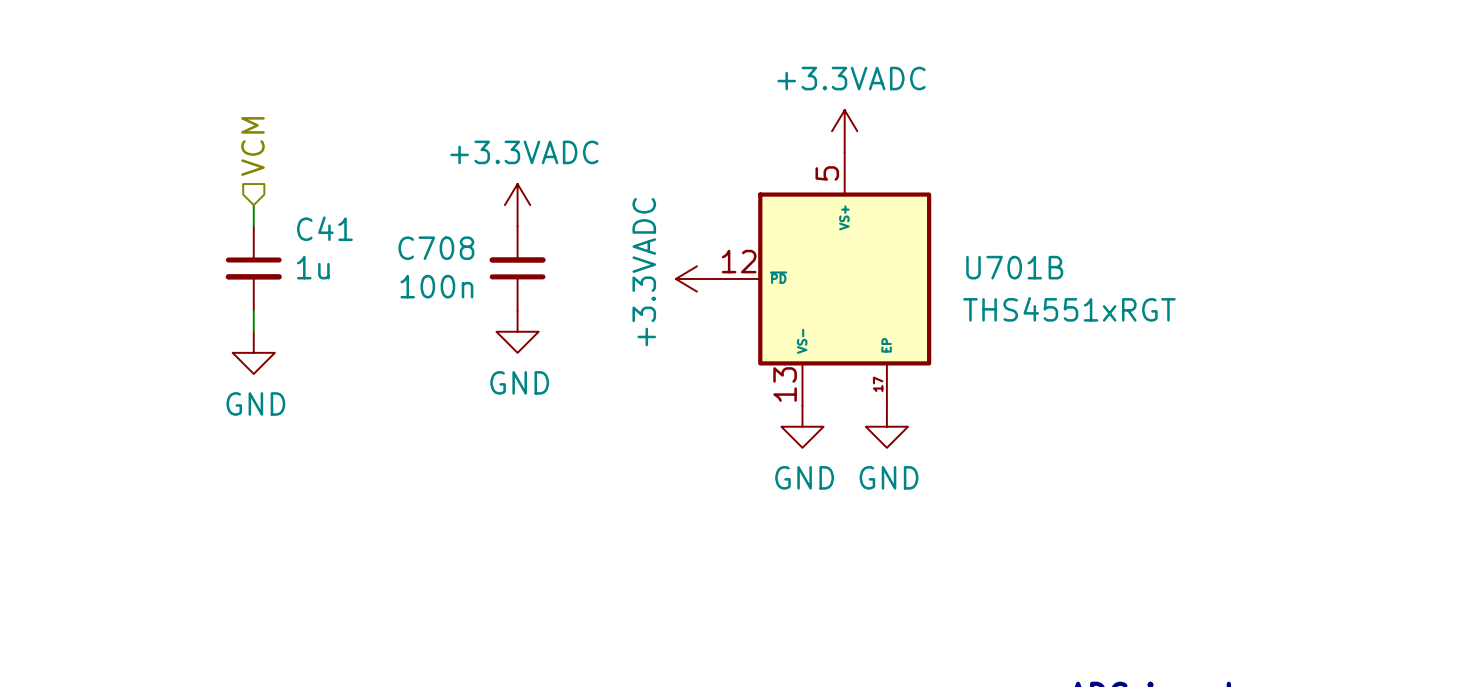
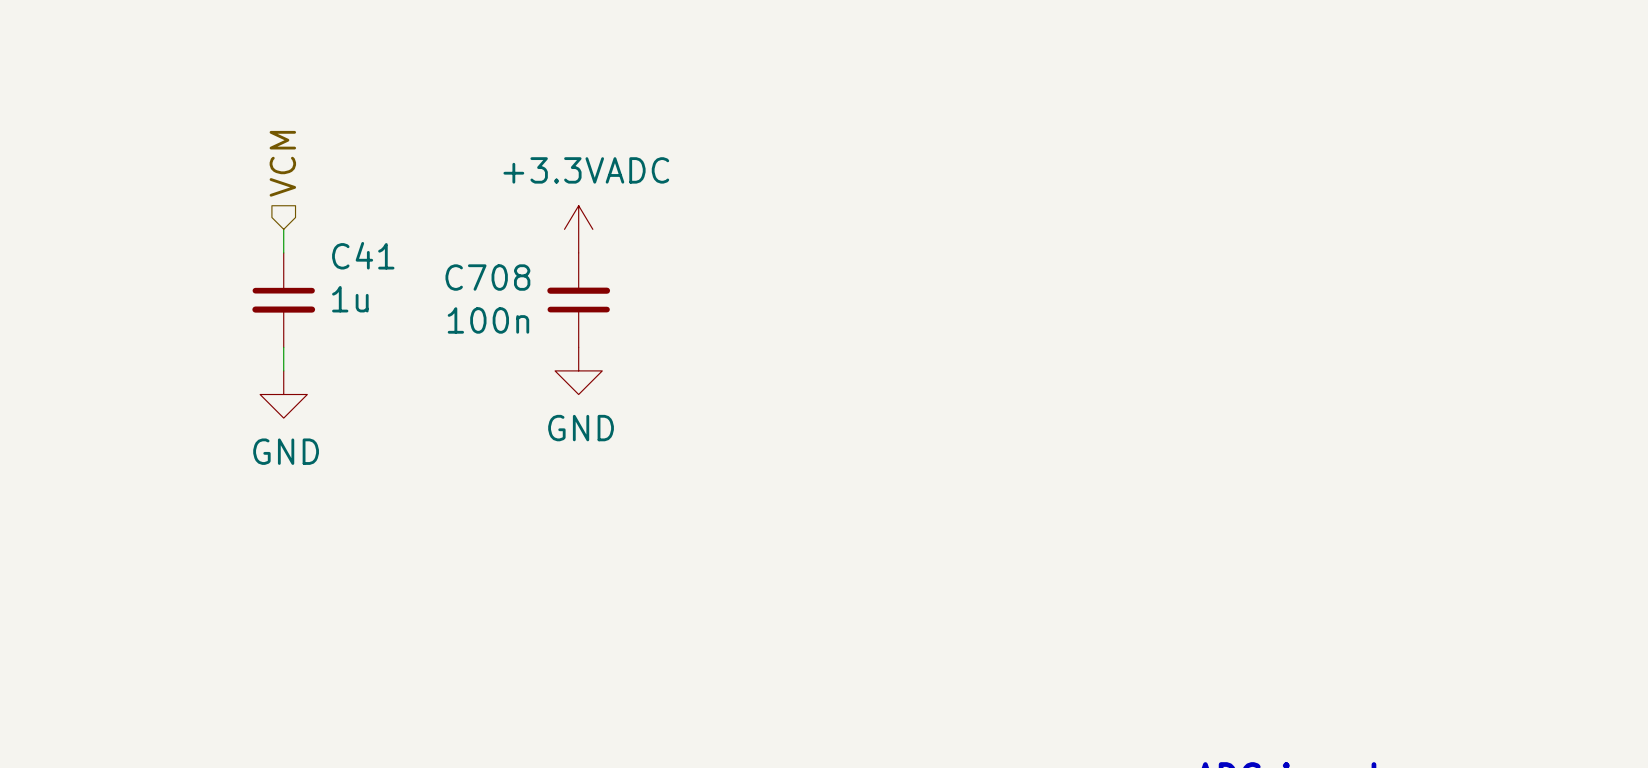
power symbol: +3.3VADC (844, 131) -> none
power symbol: +3.3VADC (696, 278) -> none
U701B: THS4551xRGT (824, 278) -> none
power symbol: GND (802, 426) -> none
power symbol: GND (886, 426) -> none

